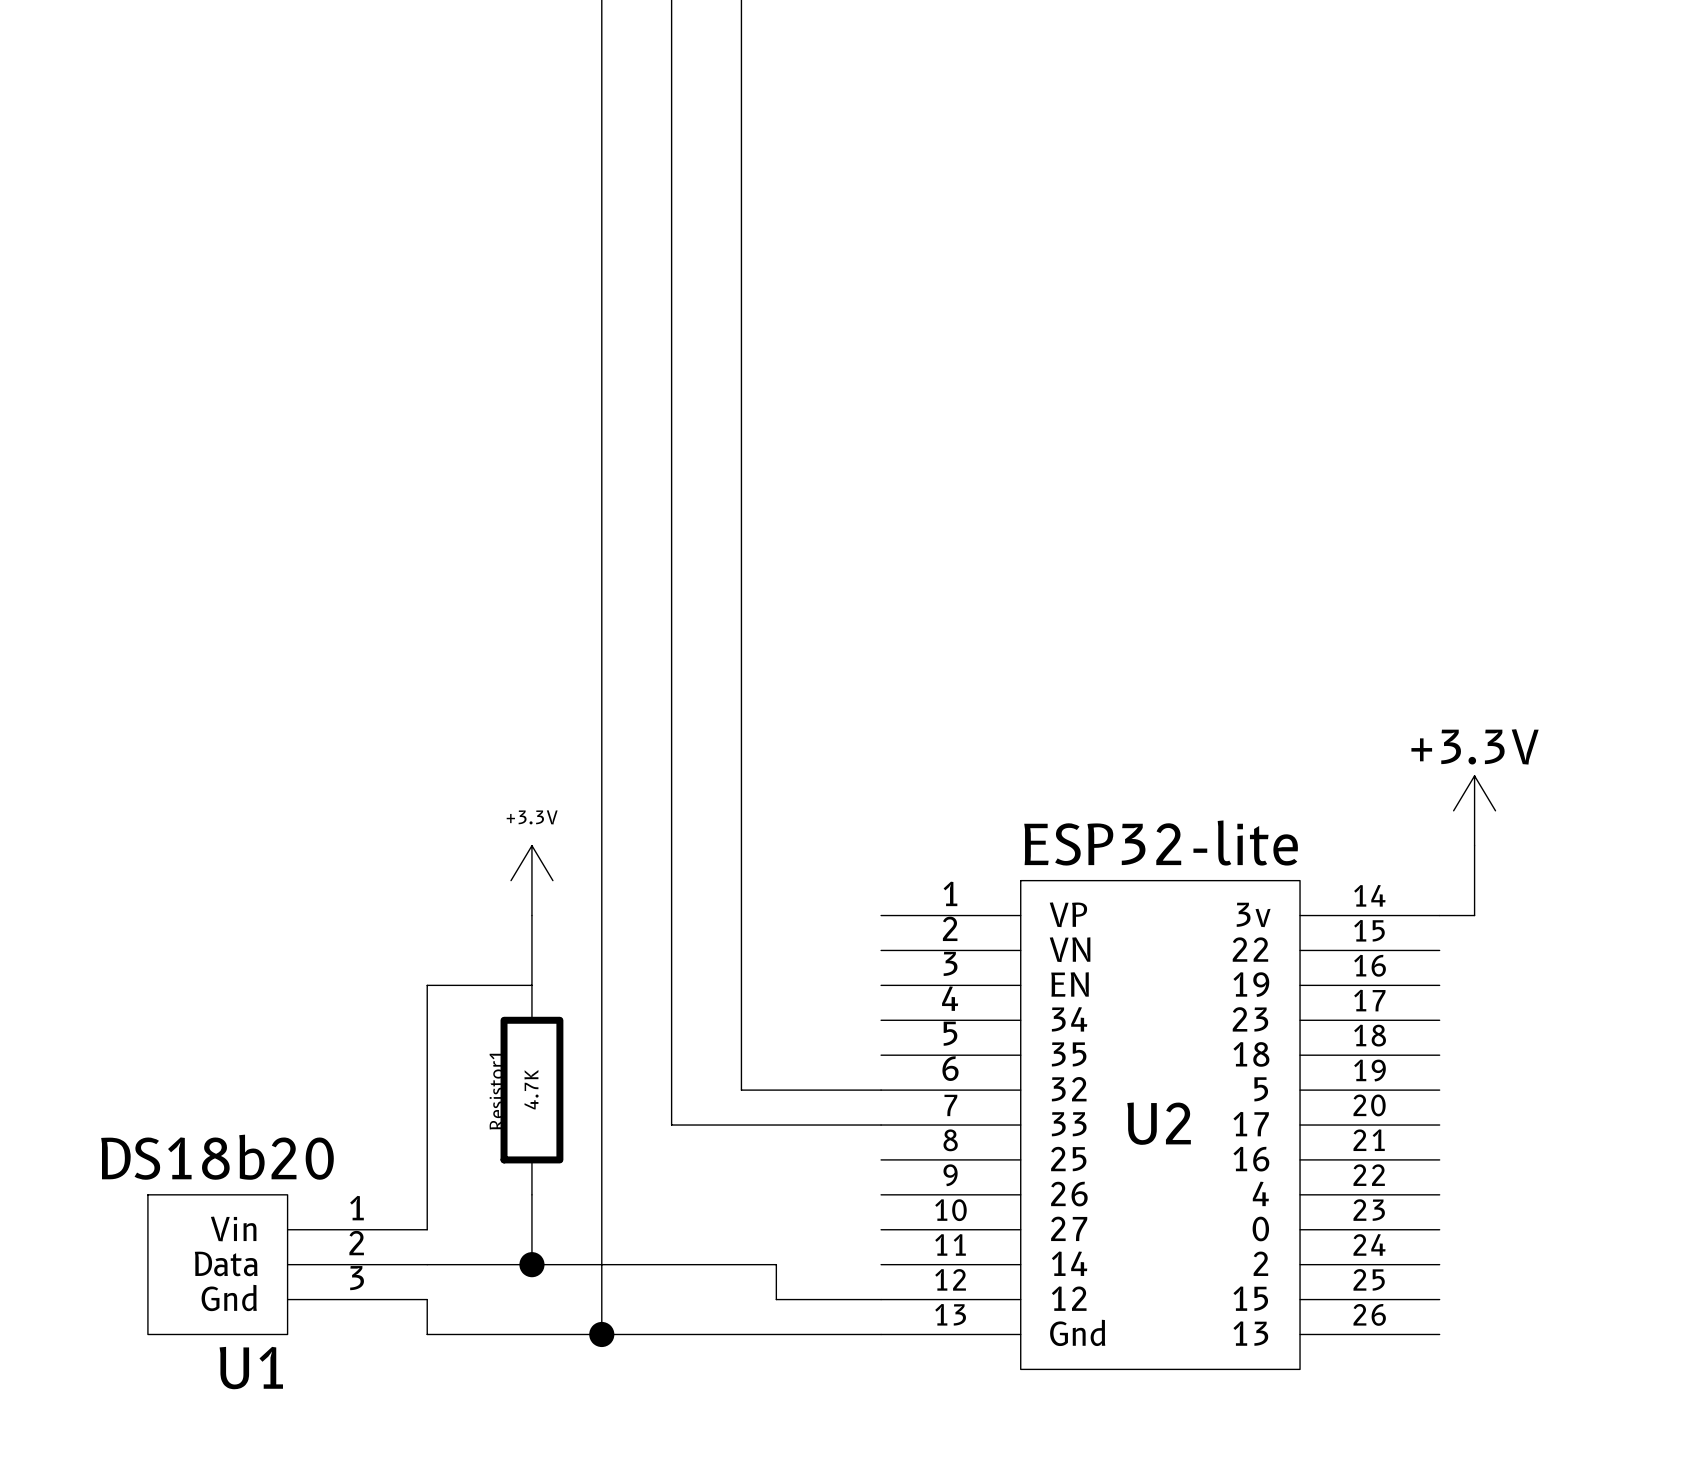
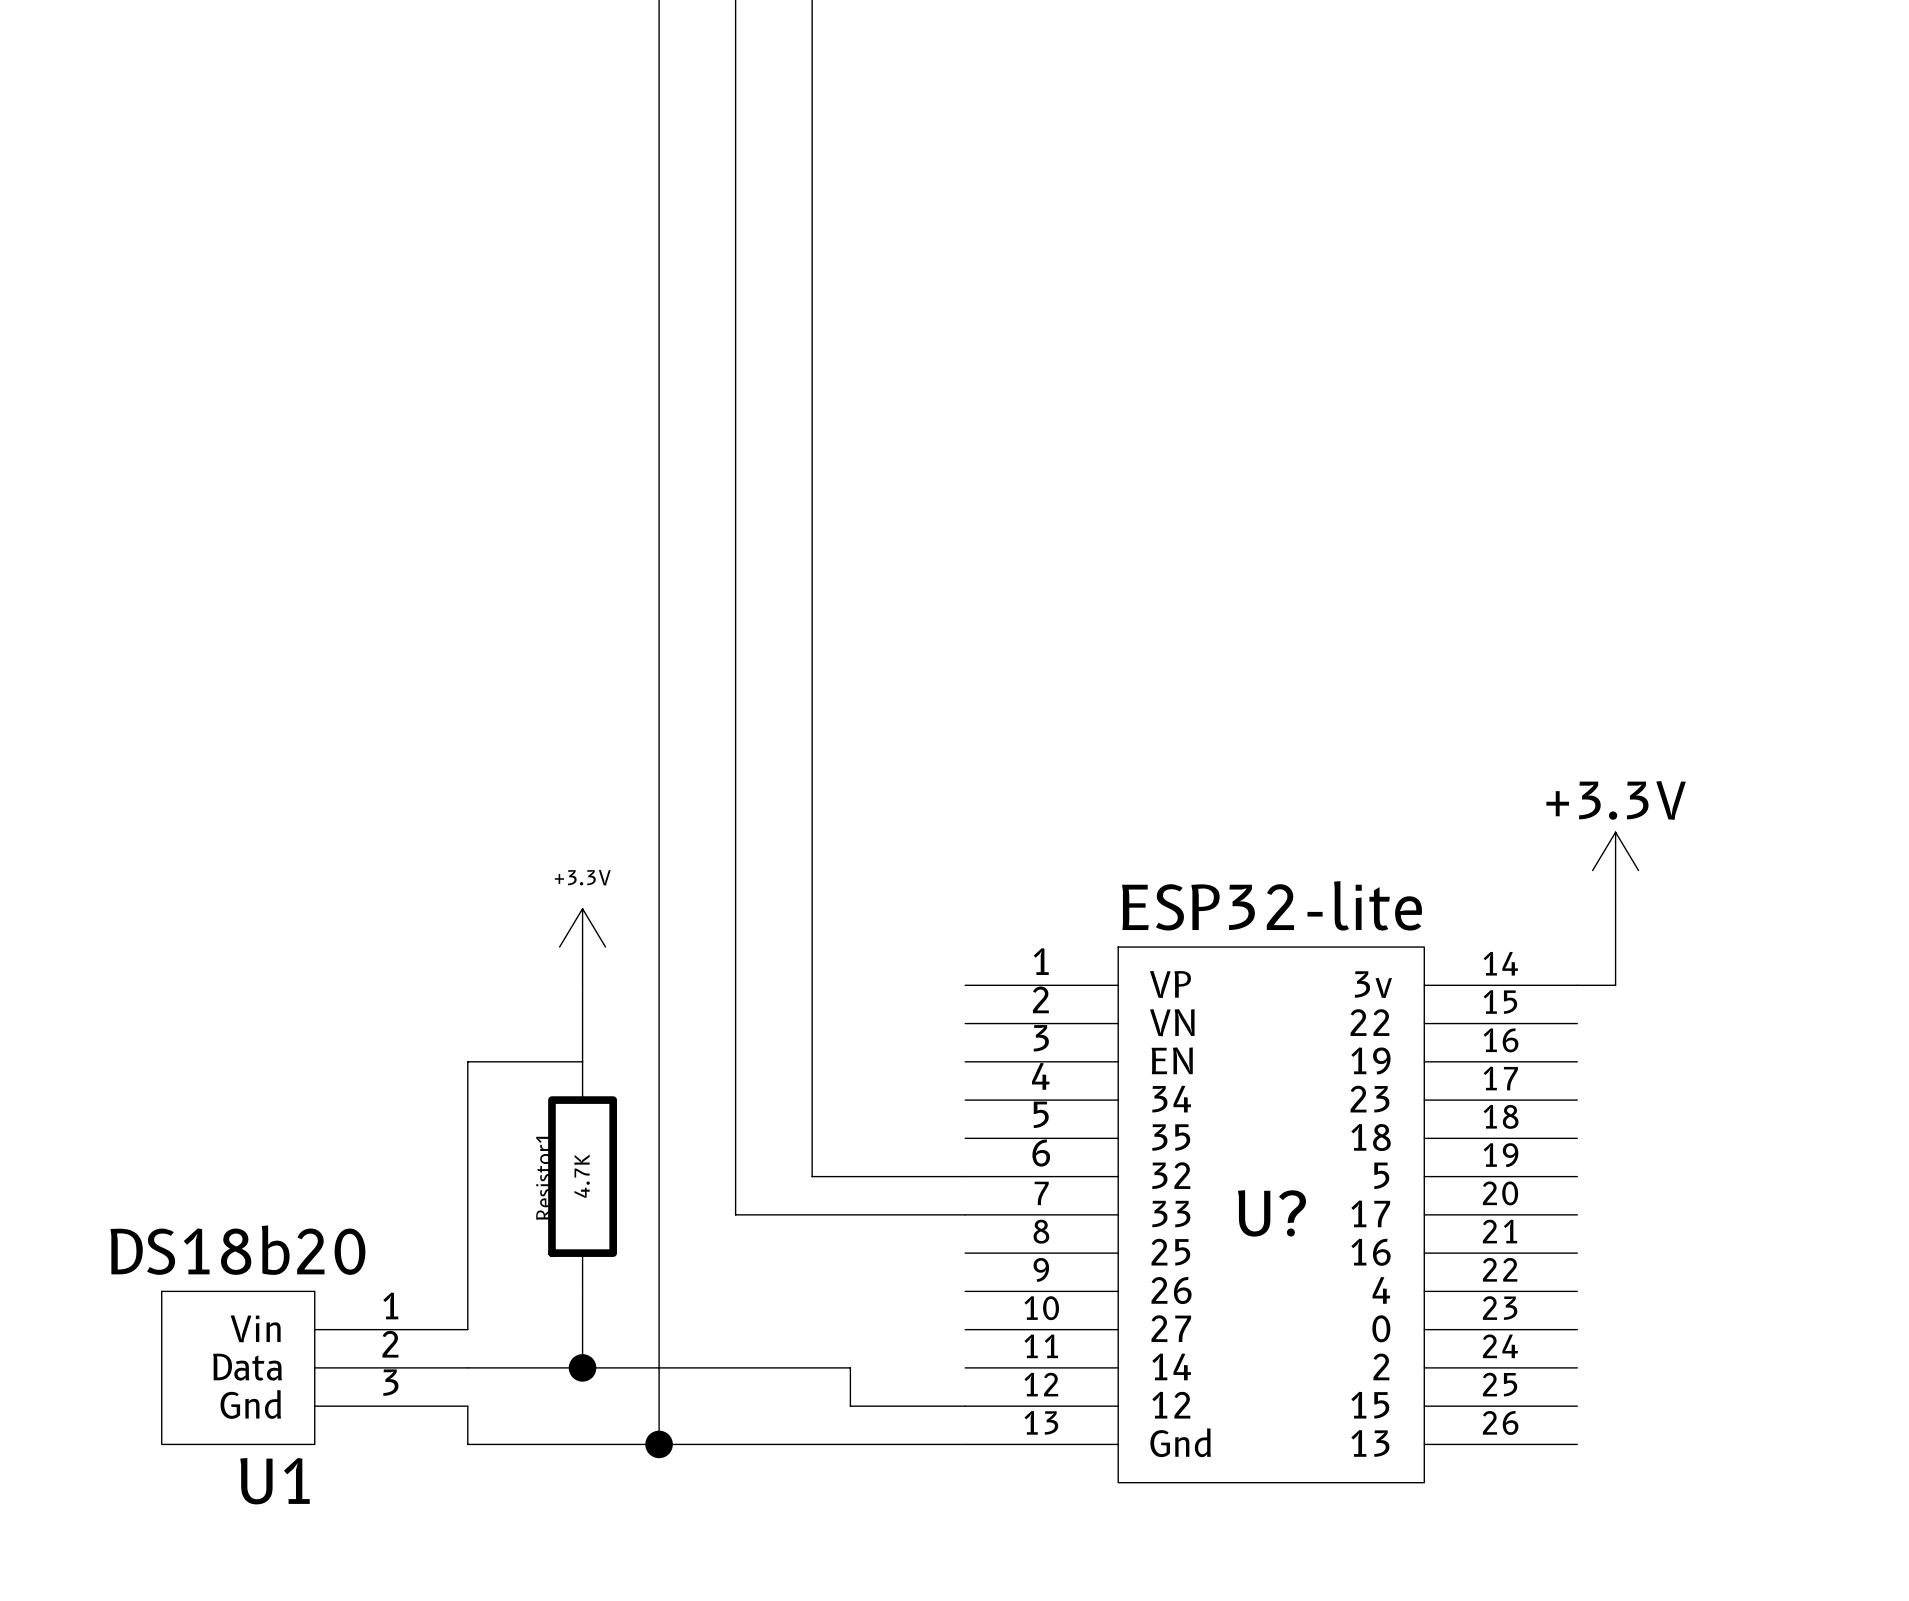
U2 name: U2 (1159, 1123) -> U? (1272, 1213)

